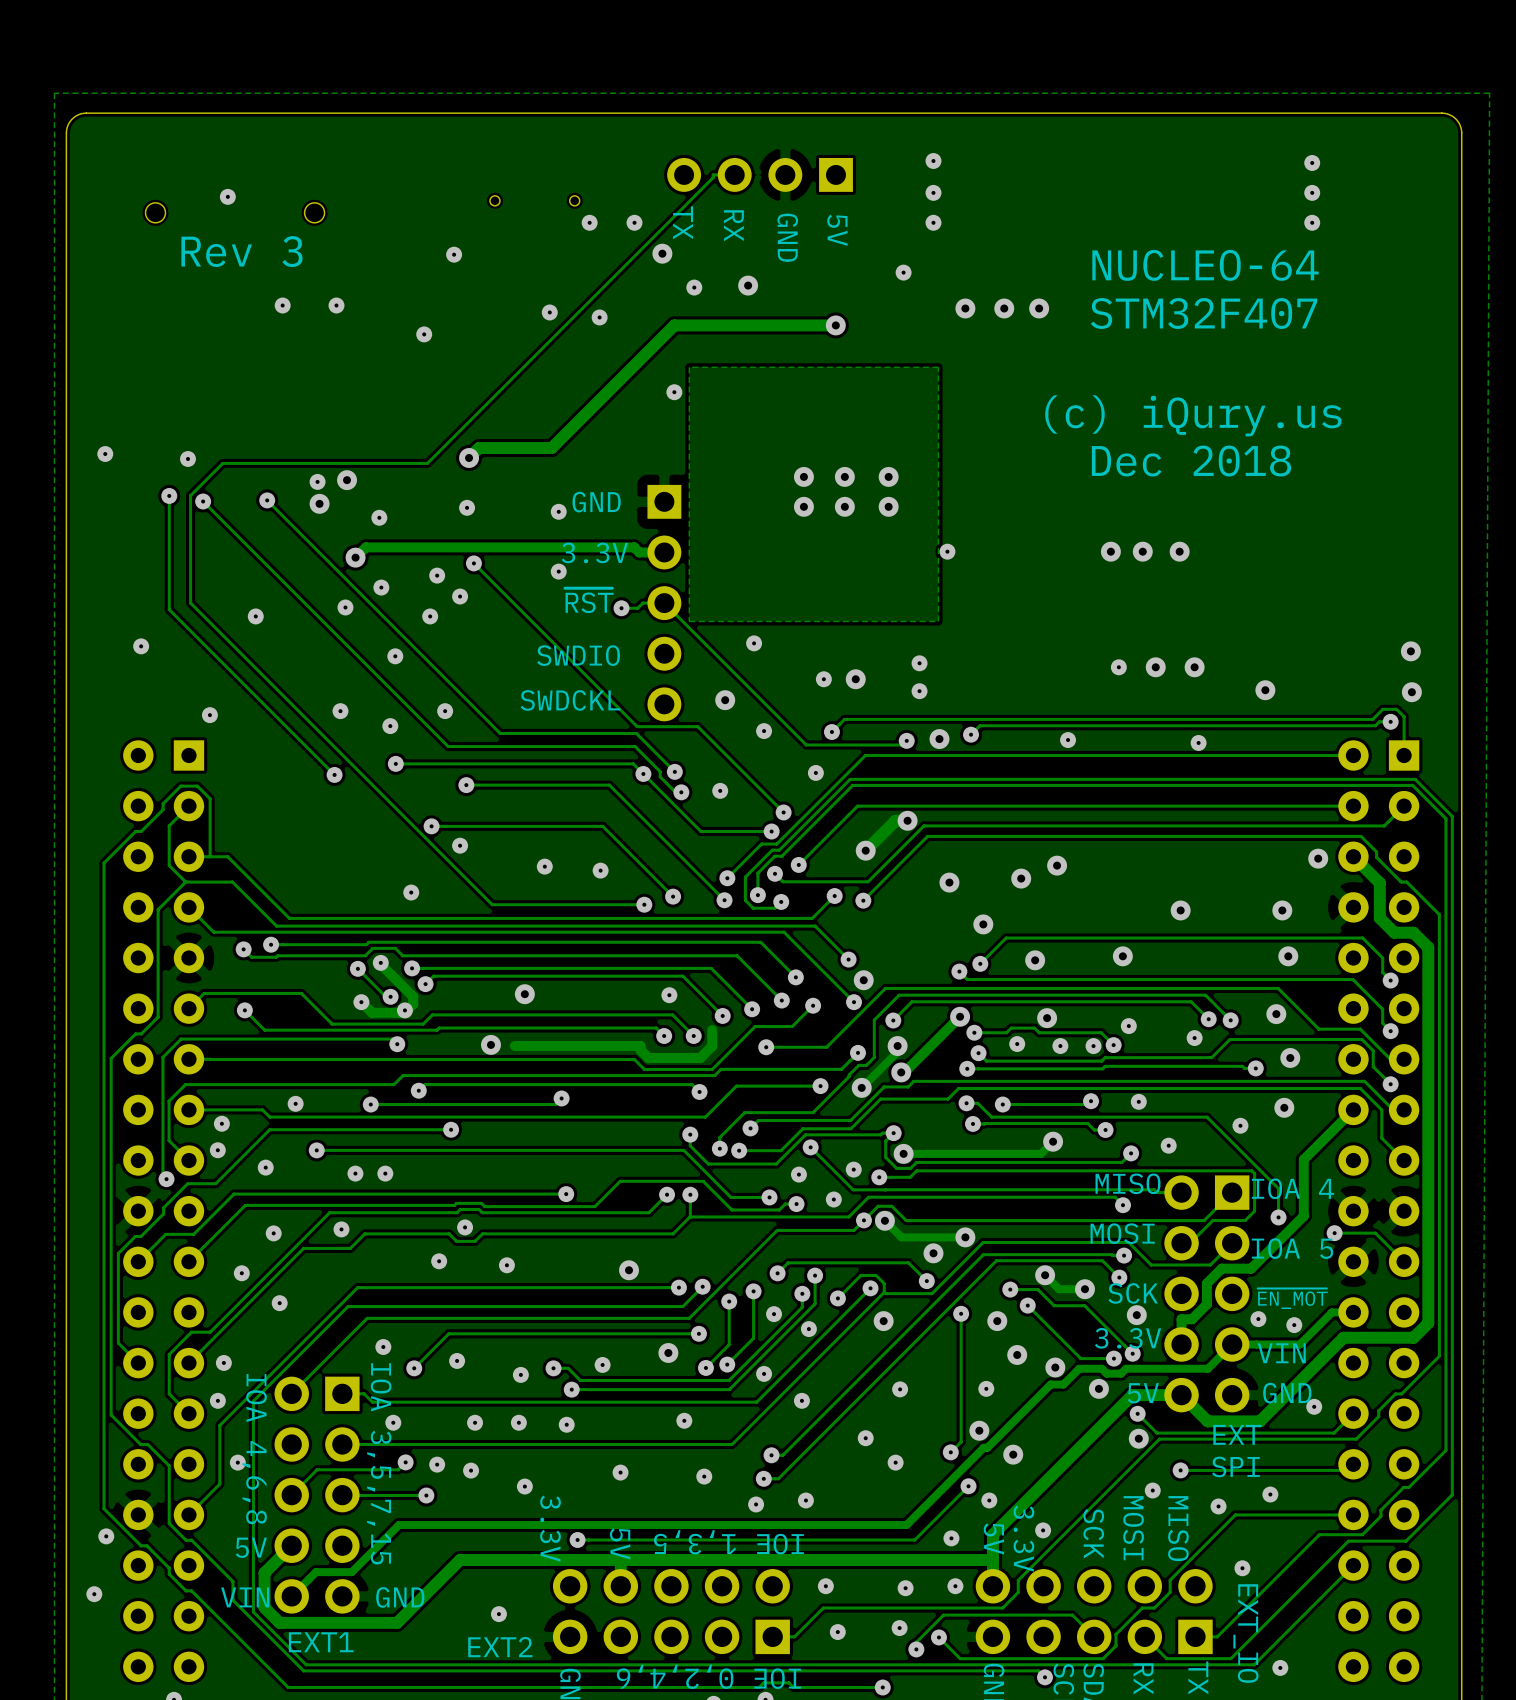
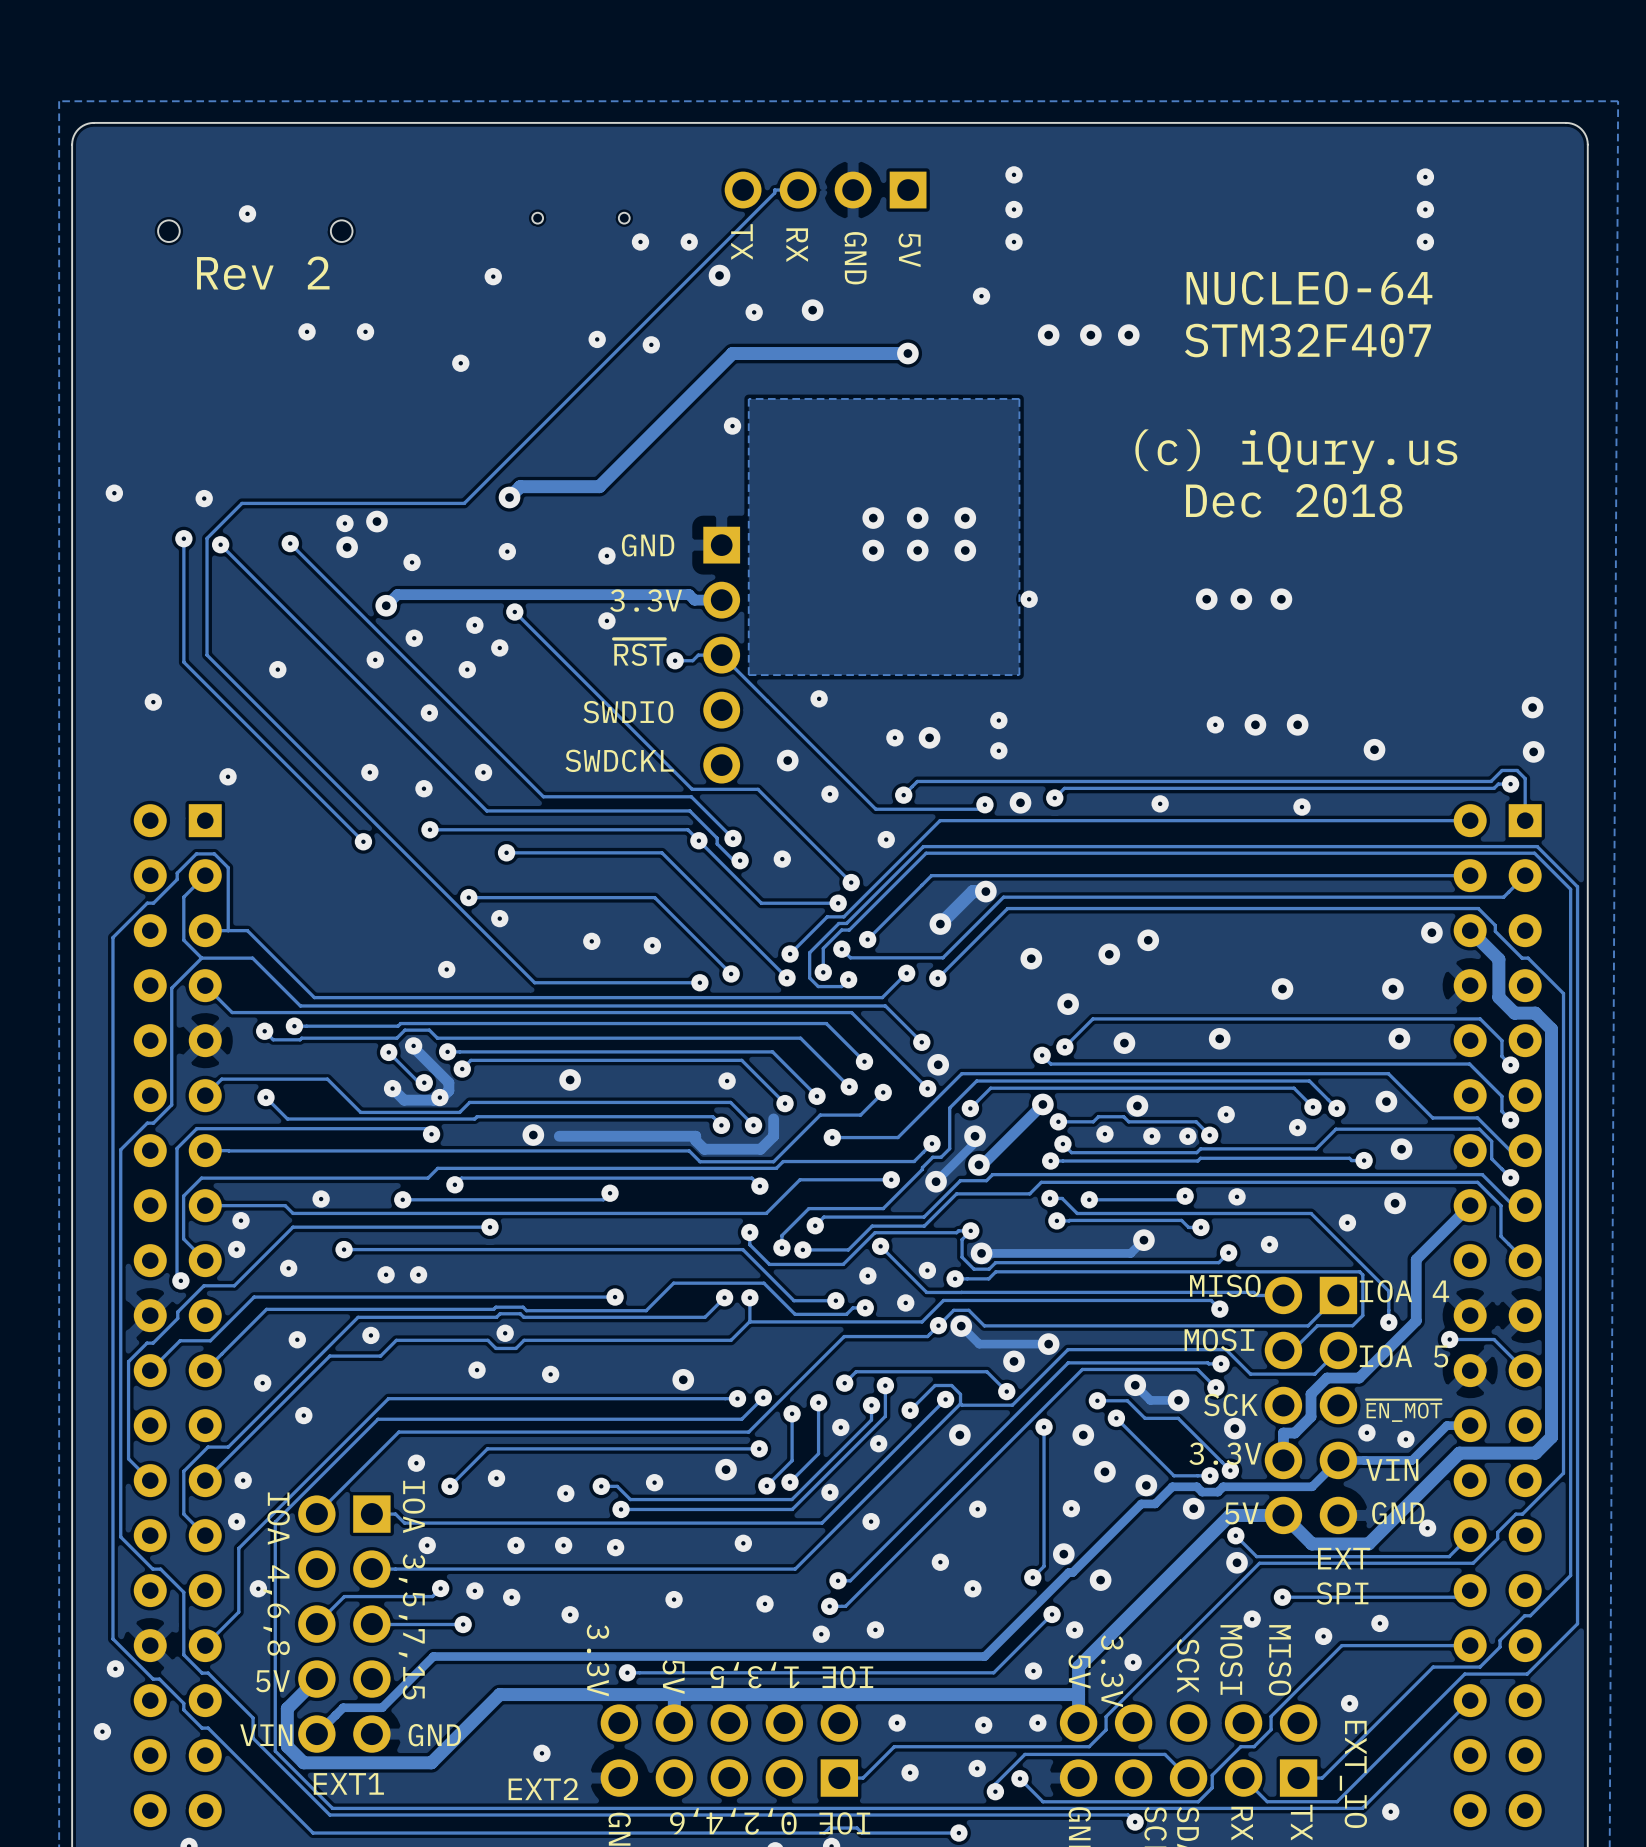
text: Rev 3 (241, 251) -> Rev 2 (263, 273)

